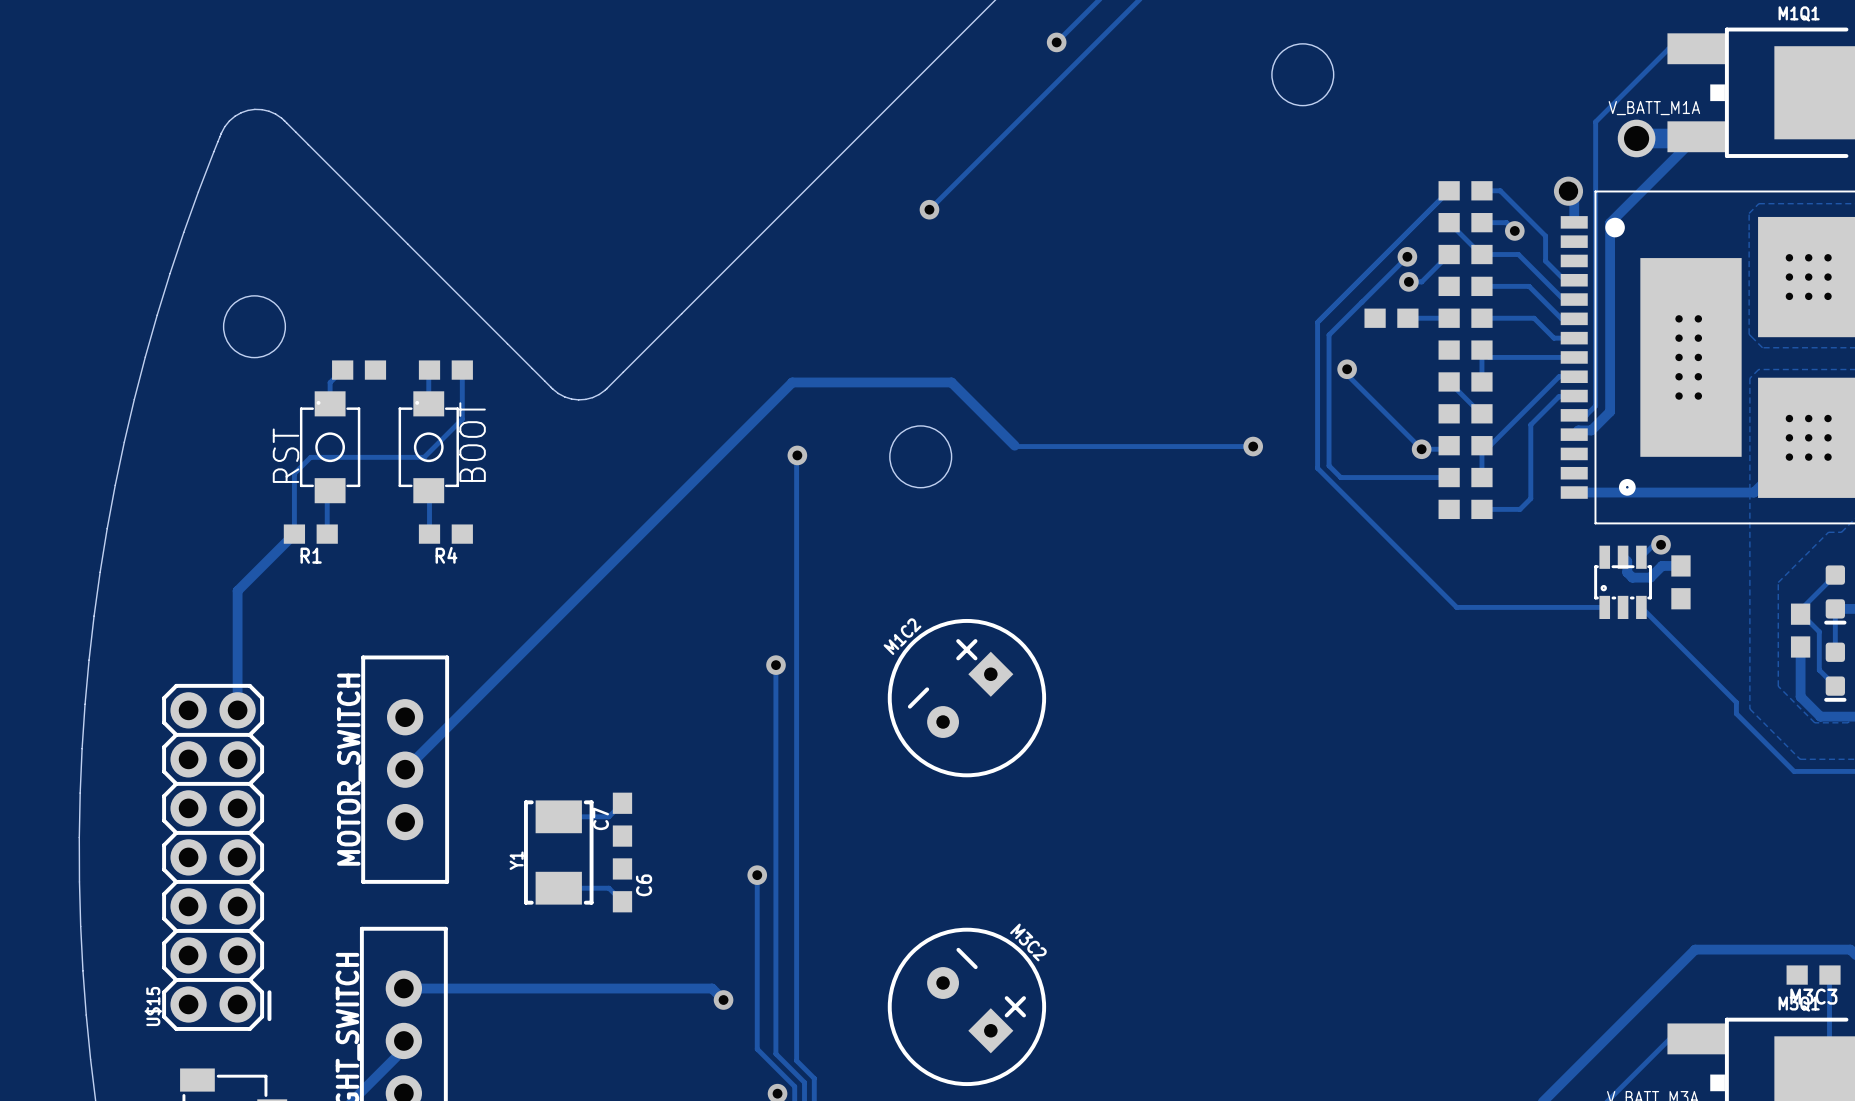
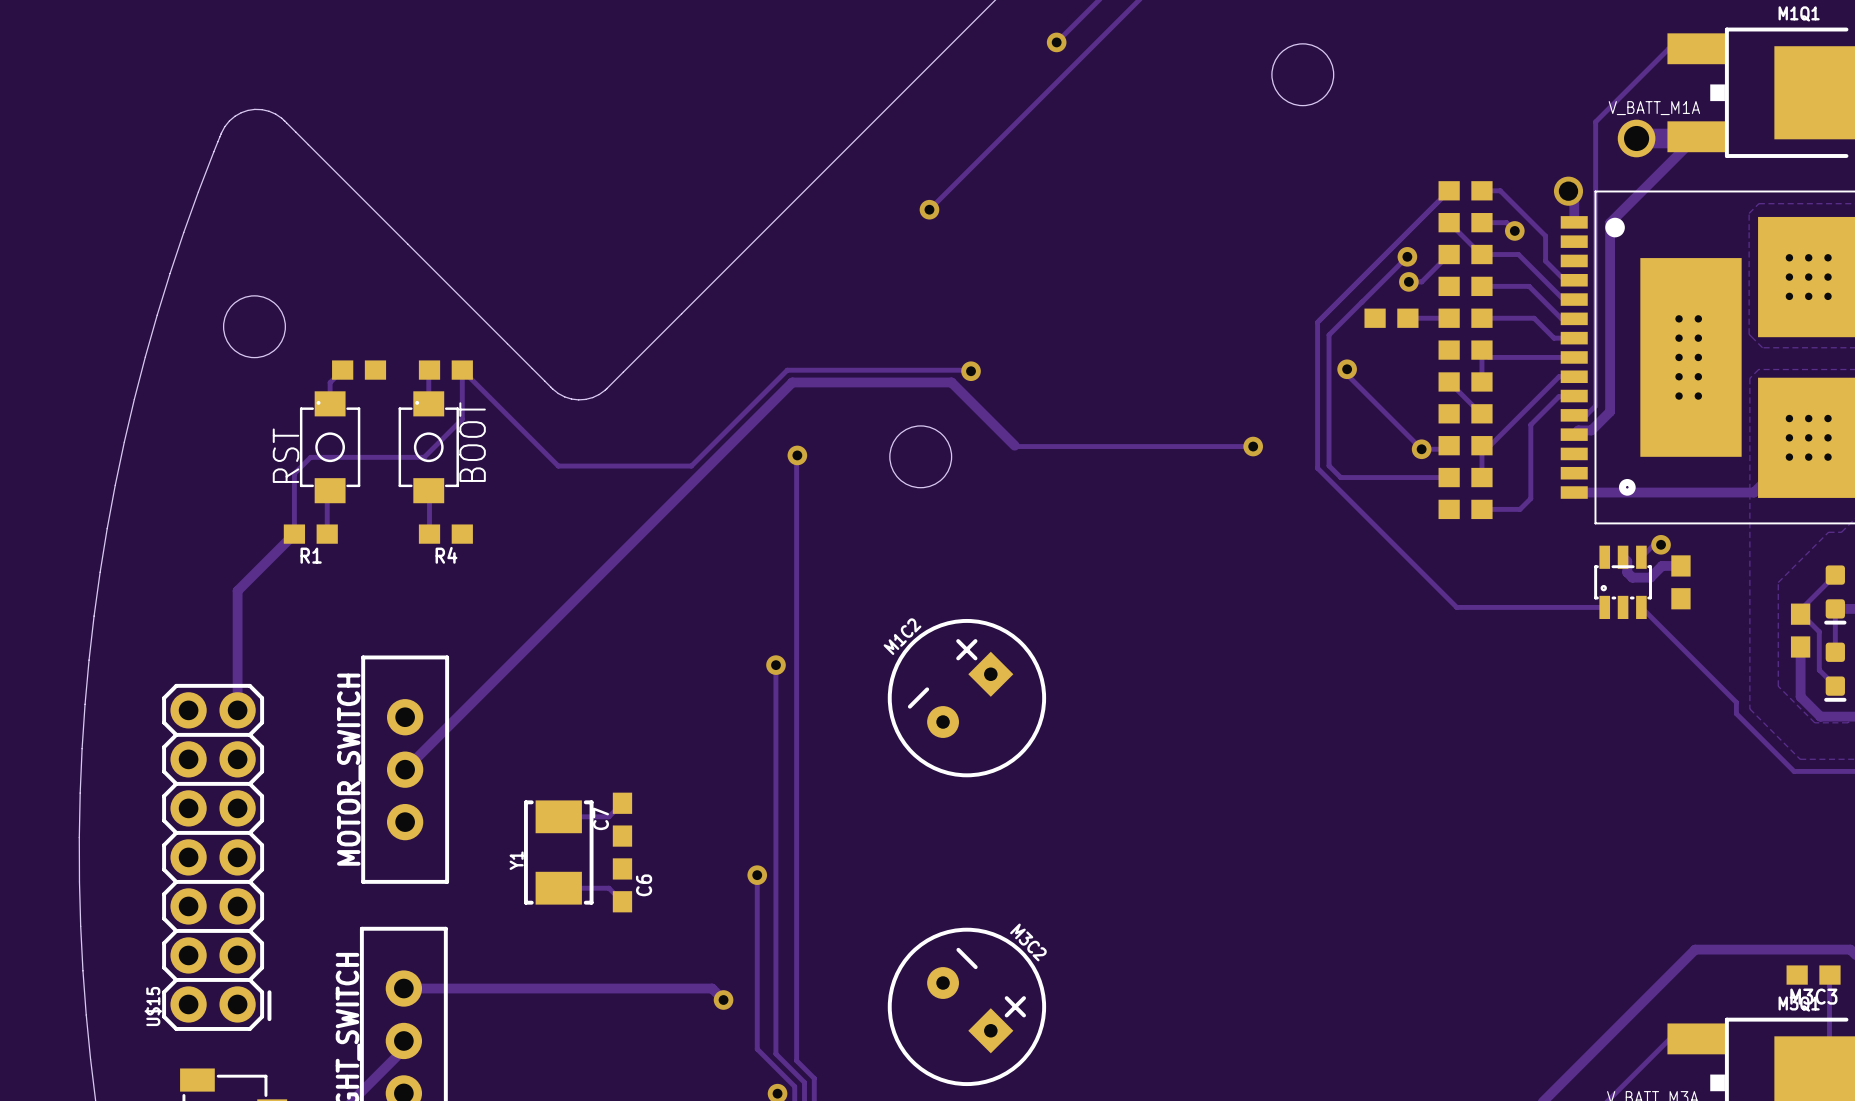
track: none -> (462, 370) (558, 466) (691, 466) (787, 370) (971, 371)
via: none -> (971, 371)

